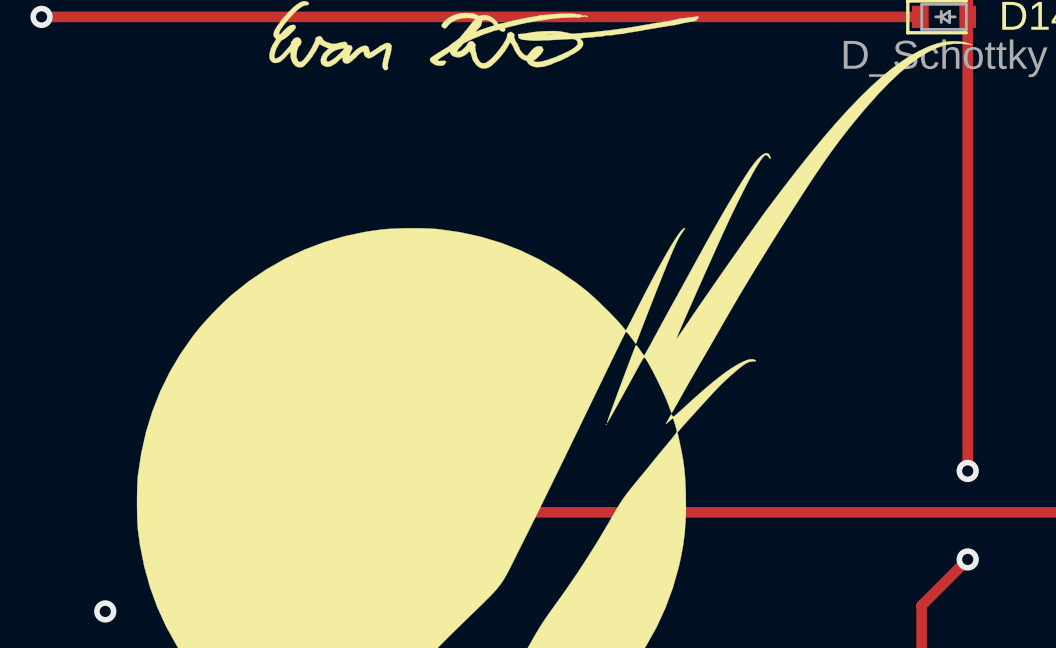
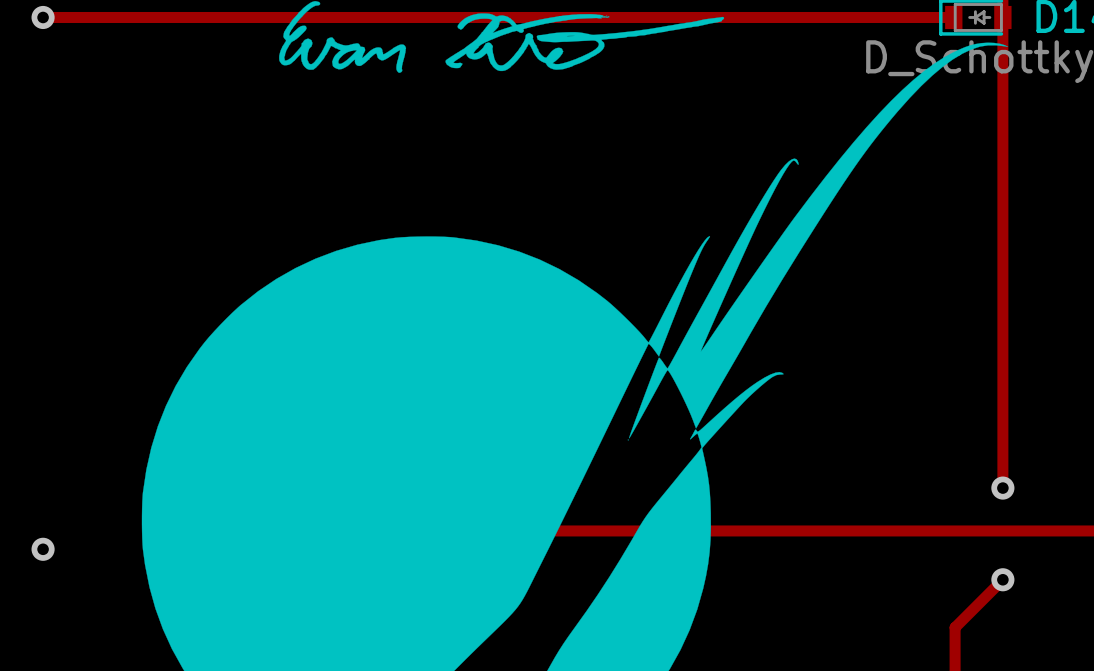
via position: (105, 611) -> (43, 549)

